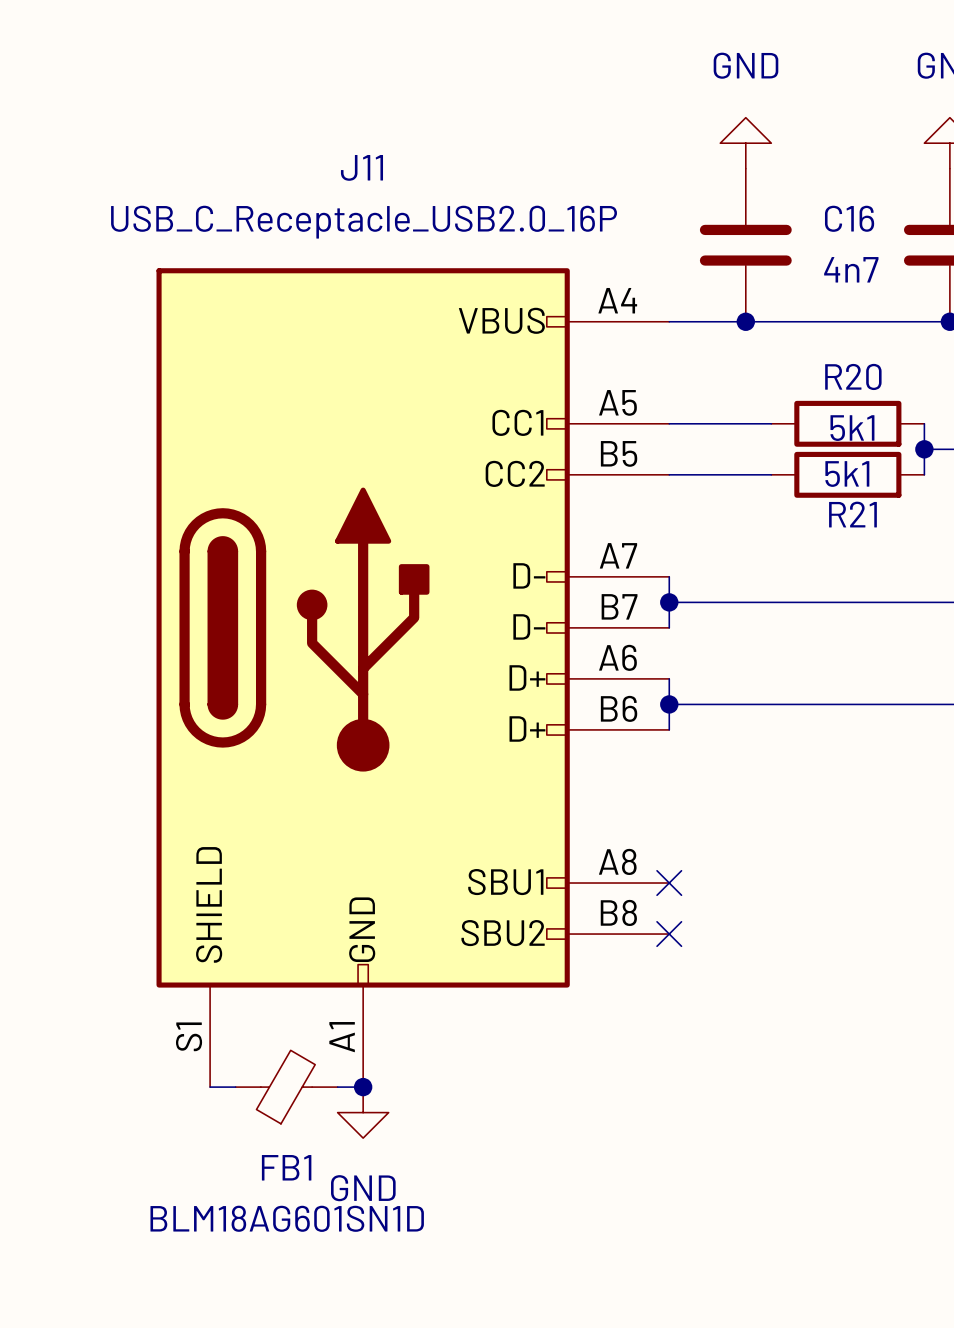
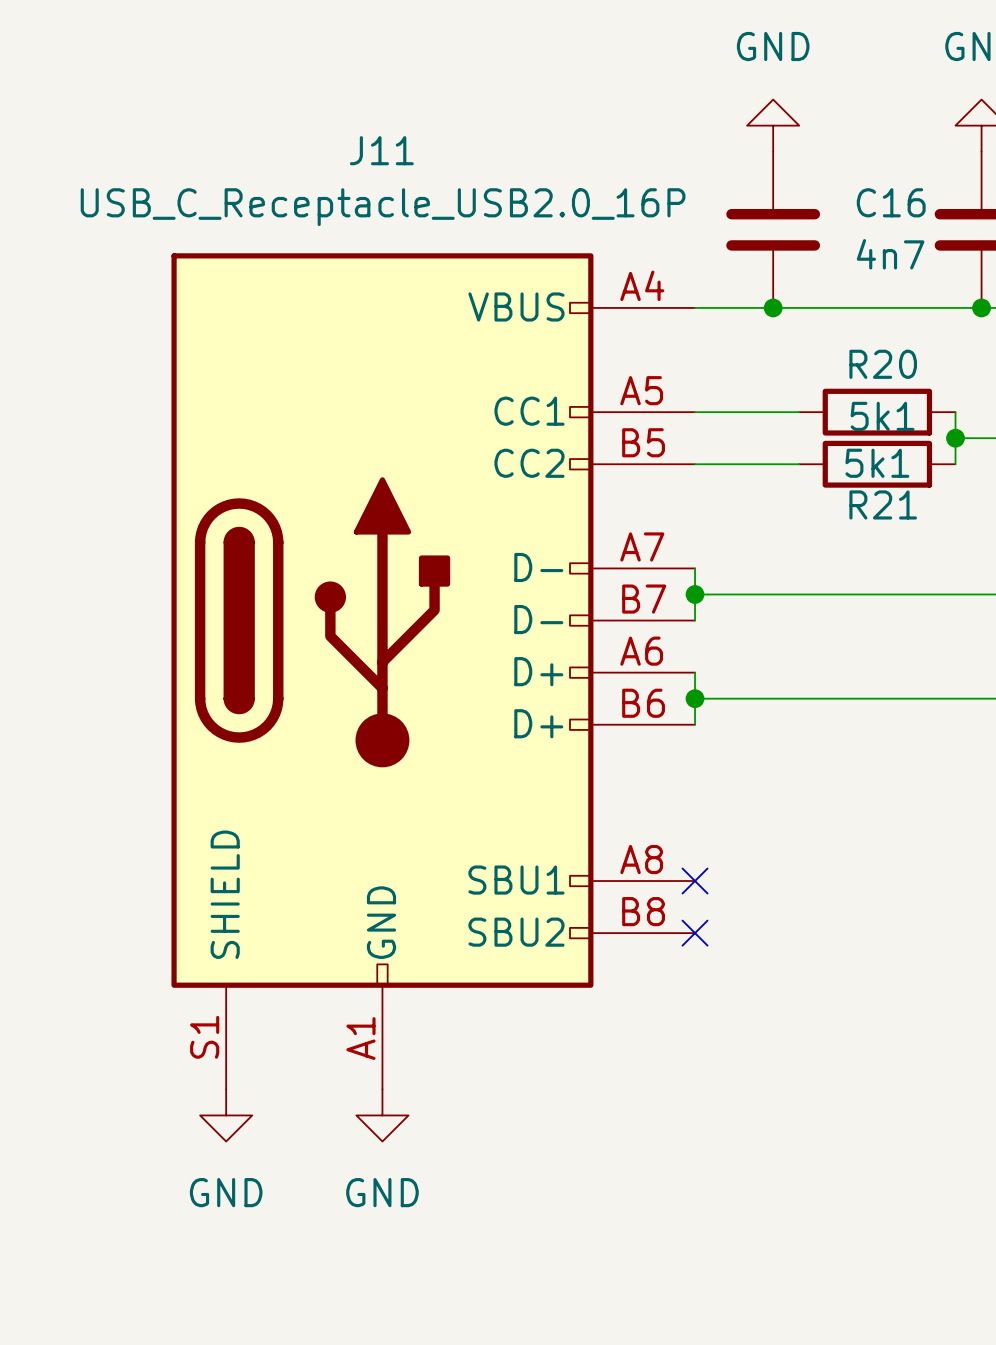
wire: (210, 1087) (235, 1087) -> none
FB1: BLM18AG601SN1D (286, 1087) -> none
wire: (337, 1087) (363, 1087) -> none
junction: (363, 1087) -> none
power symbol: none -> GND (226, 1115)

